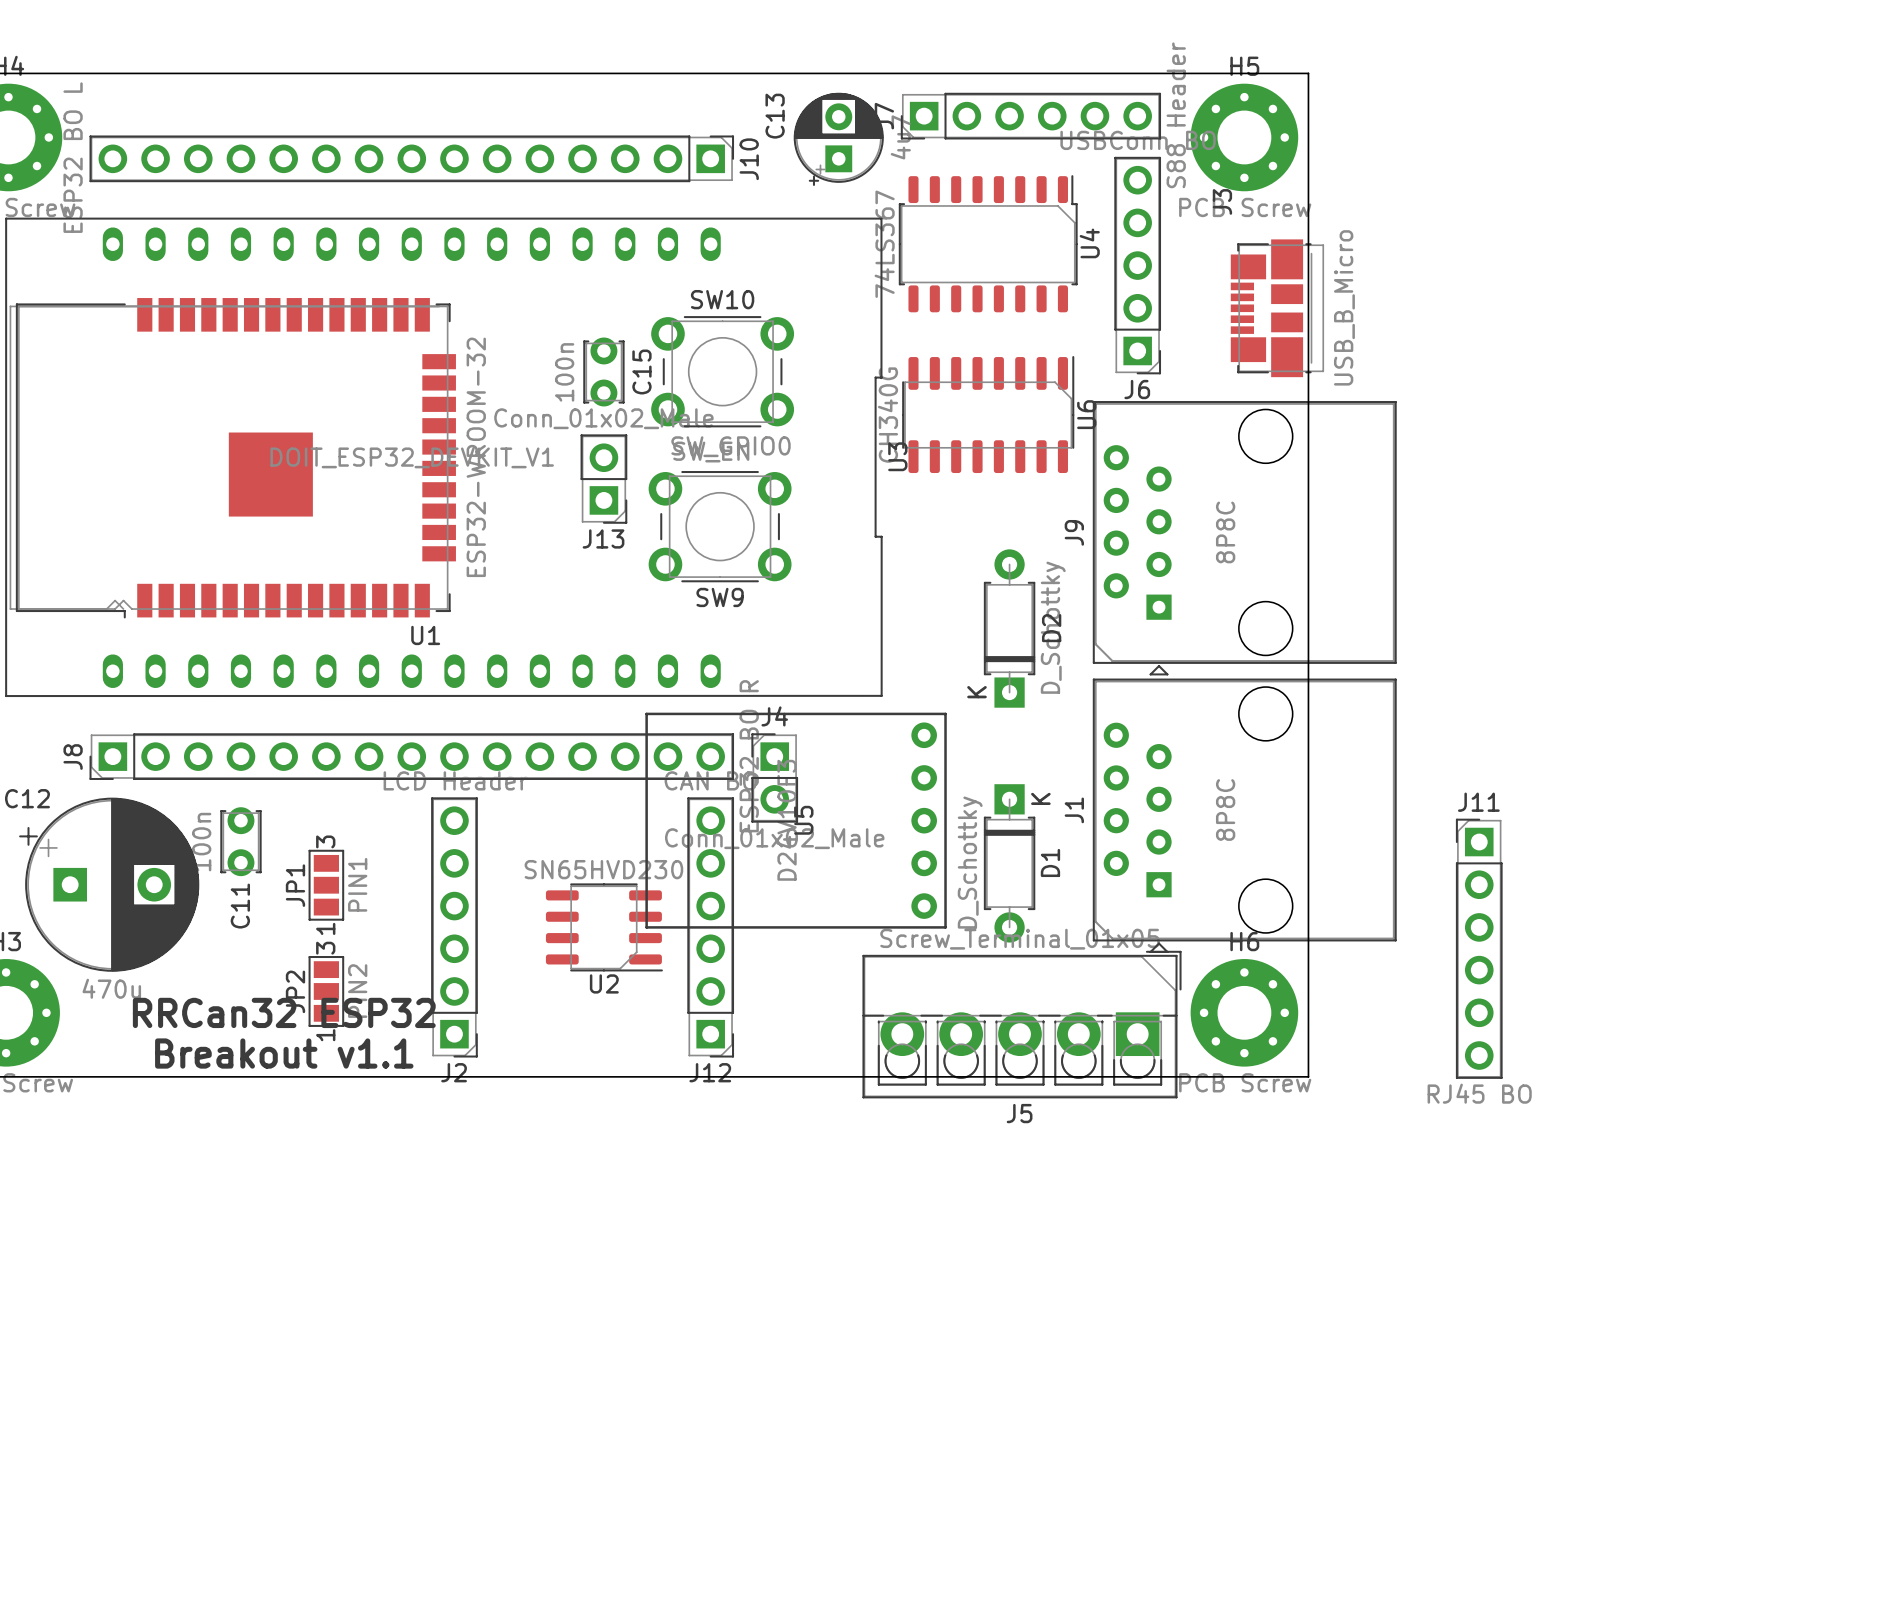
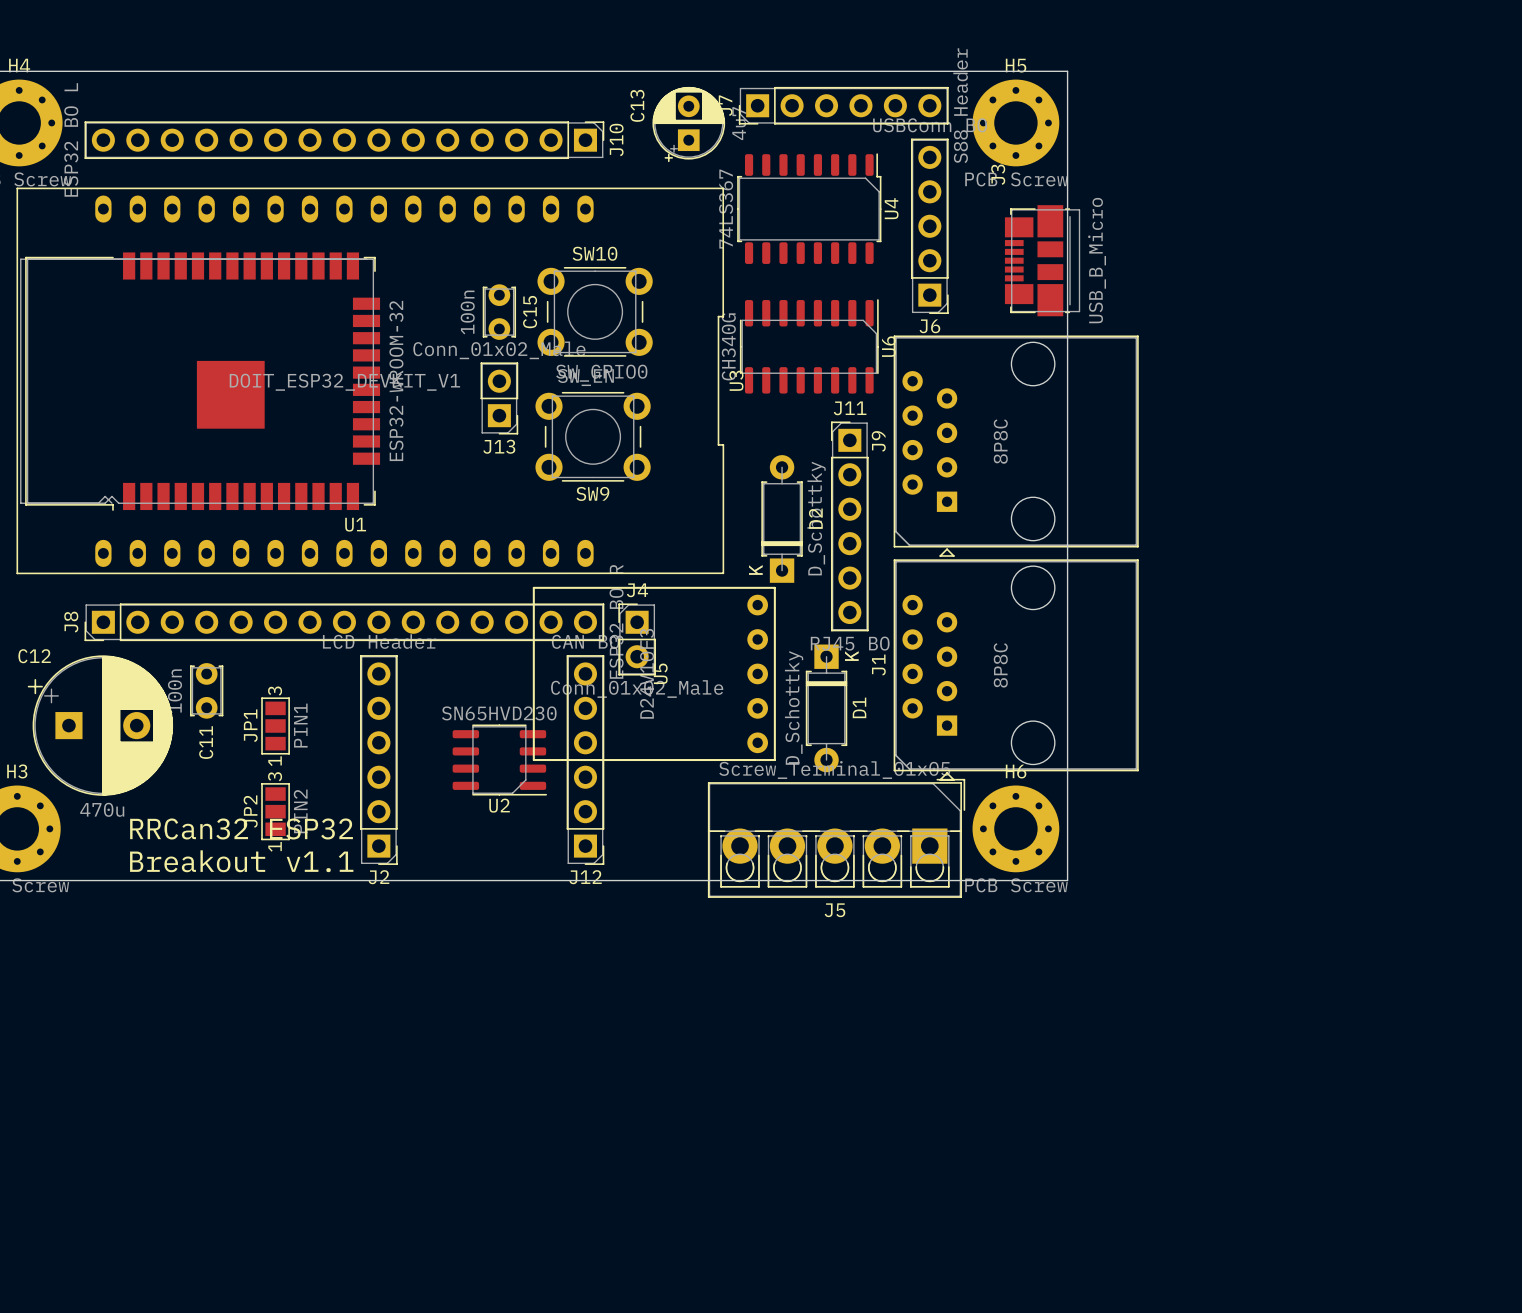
D2 position: (1009, 628) -> (782, 518)
J11 position: (1479, 948) -> (849, 526)

